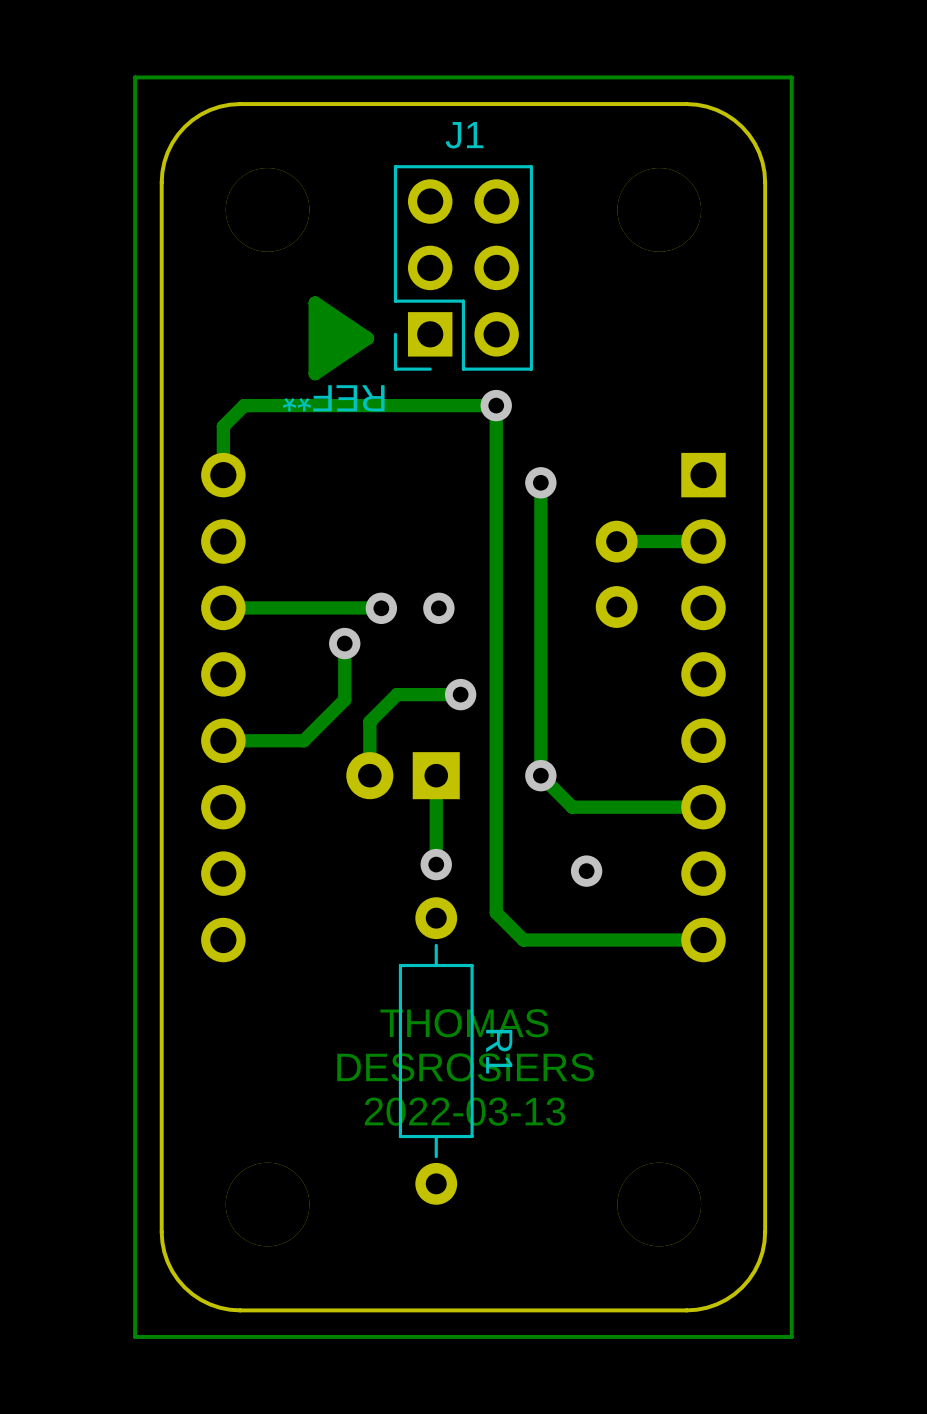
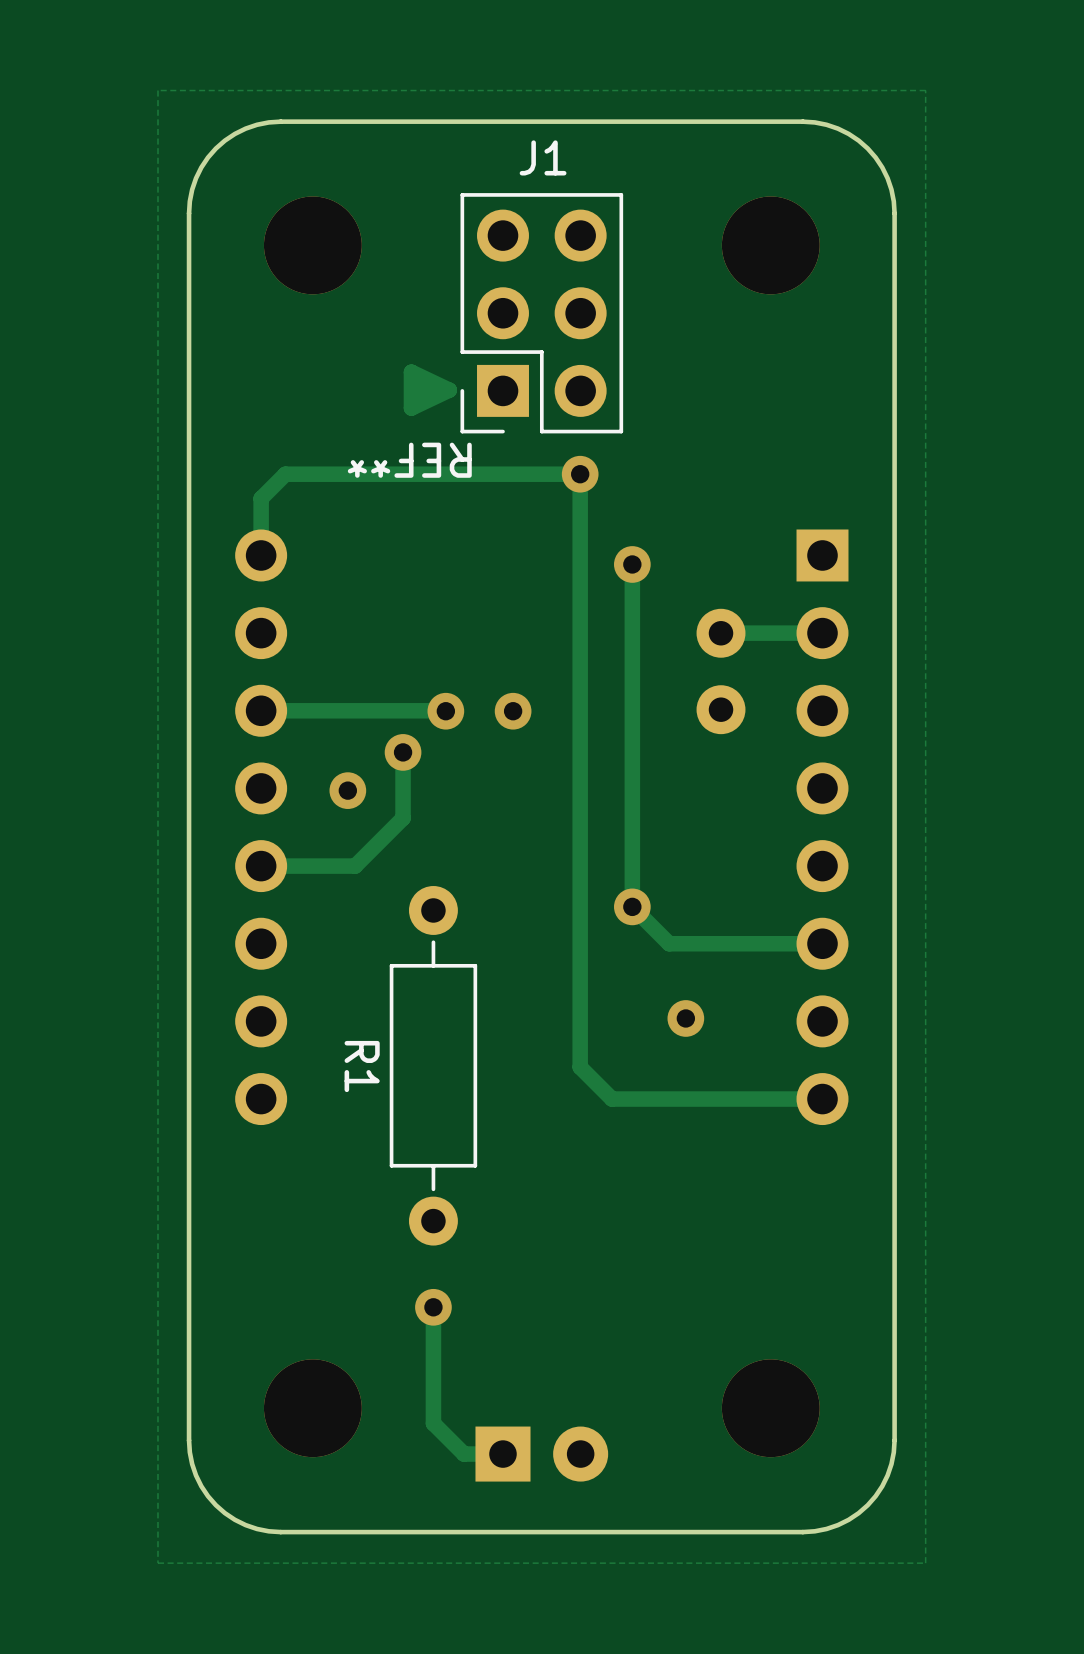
track: (791, 77) (135, 77) (135, 1336) (791, 1336) (791, 77) -> none
REF**: none -> (430, 390)
REF**: (341, 338) -> none
via: none -> (347, 790)
track: (460, 694) (397, 694) (369, 721) (369, 780) -> none
via: (460, 694) -> none
part rotation: 0° (403, 775) -> 180° (541, 1454)
part position: (403, 775) -> (541, 1454)
track: (436, 780) (436, 864) -> none
via: (436, 864) -> none
text: THOMAS (464, 1023) -> none
R1 position: (436, 1051) -> (433, 1065)
R1 name position: R1 (499, 1051) -> R1 (362, 1066)
text: DESROSIERS (465, 1067) -> none
text: 2022-03-13 (464, 1111) -> none
track: none -> (433, 1307) (433, 1423) (464, 1454) (502, 1454)
via: none -> (433, 1307)

